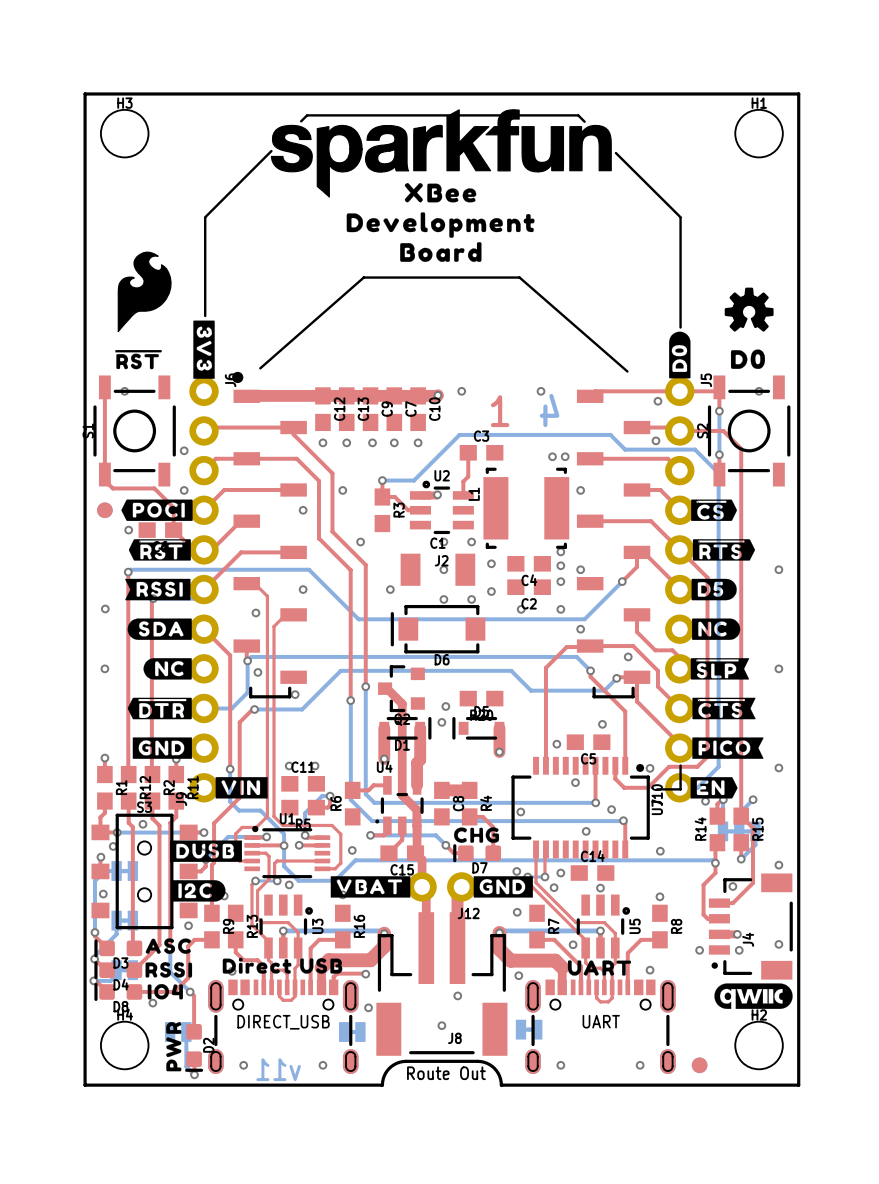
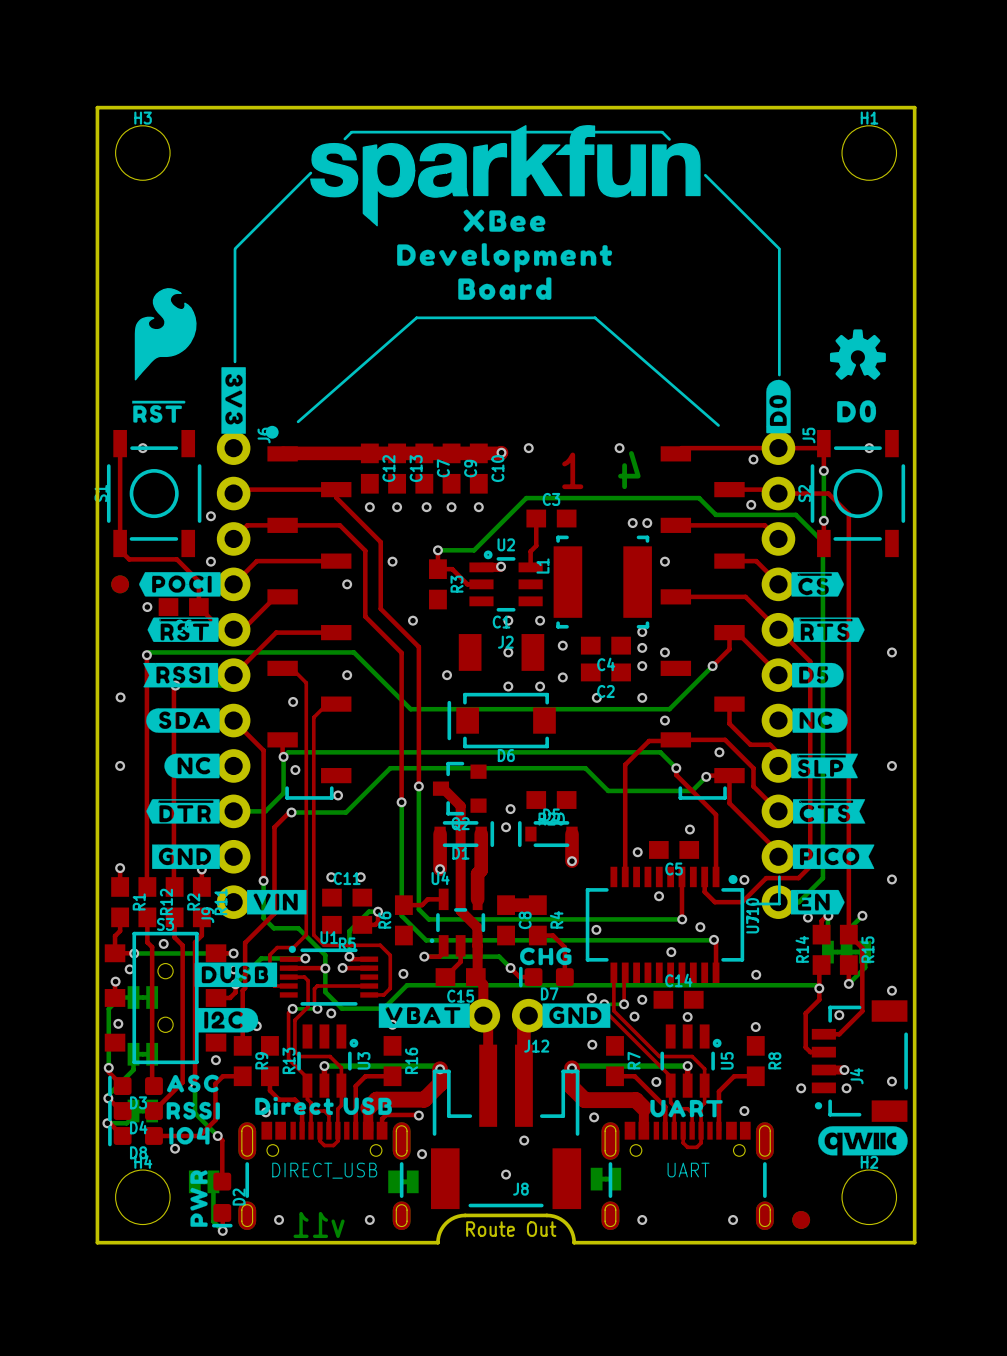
C7 name: C7 (410, 408) -> C9 (470, 468)
C9 name: C9 (387, 409) -> C7 (443, 468)

